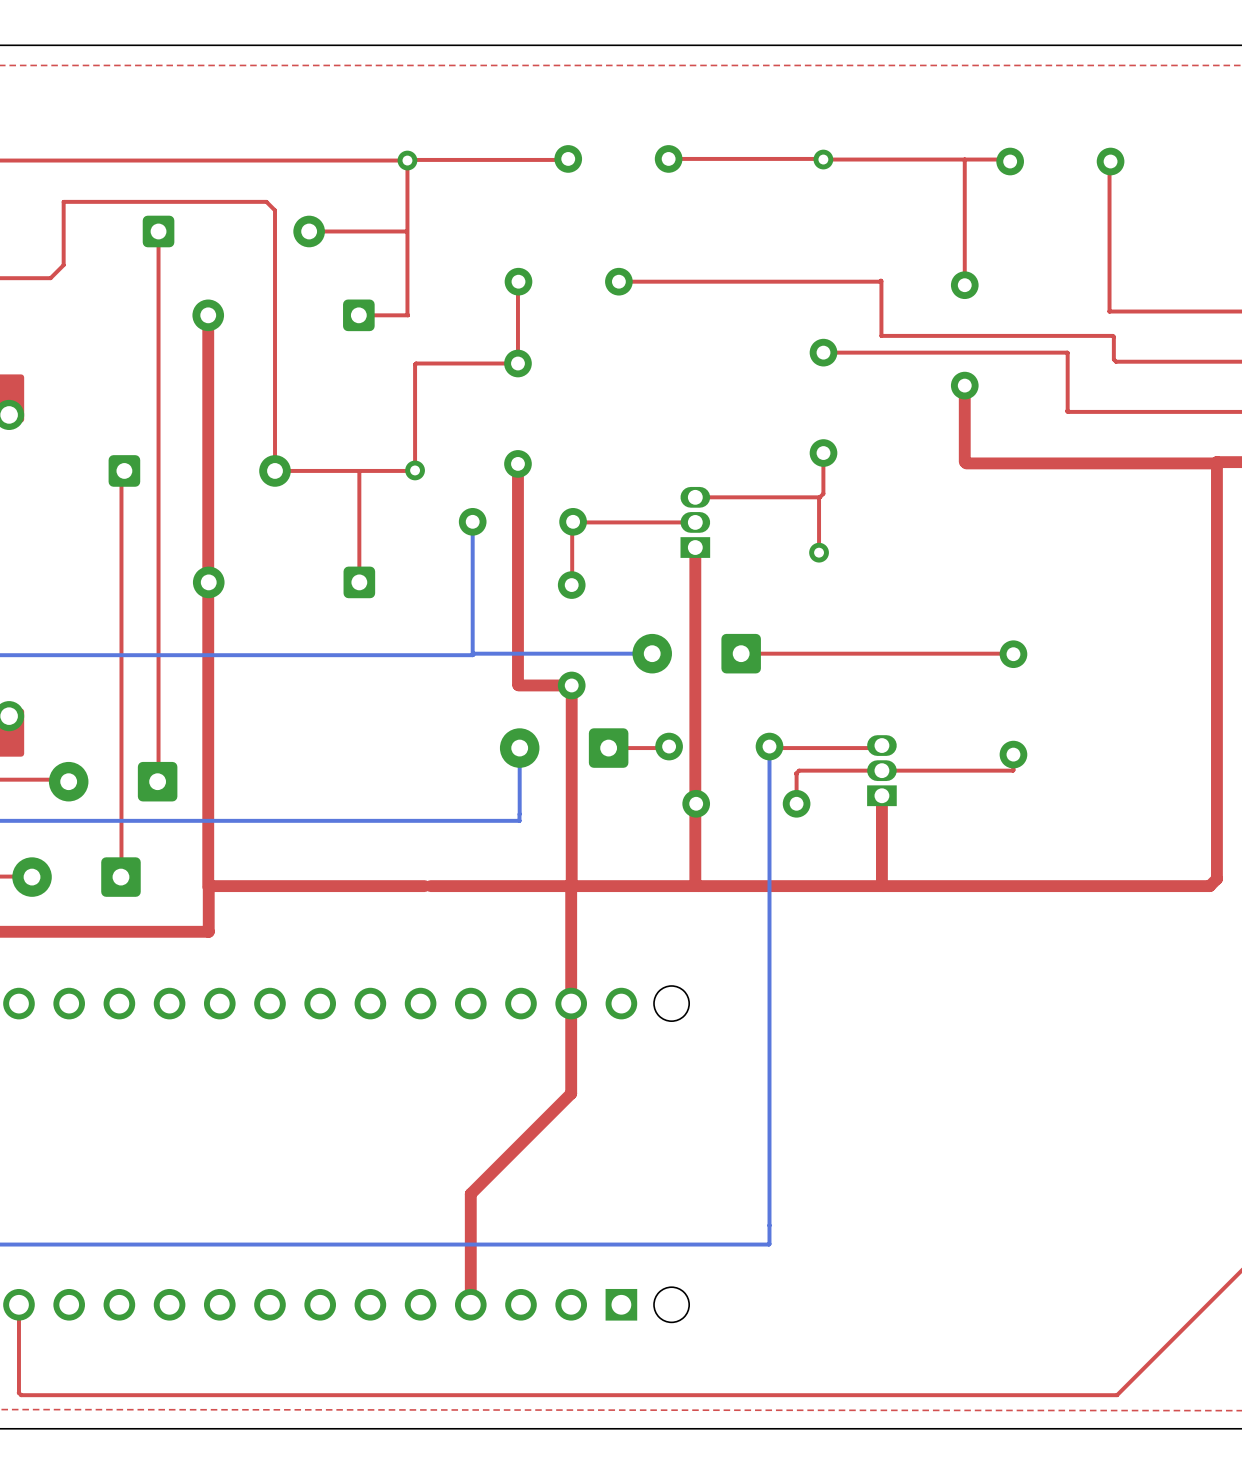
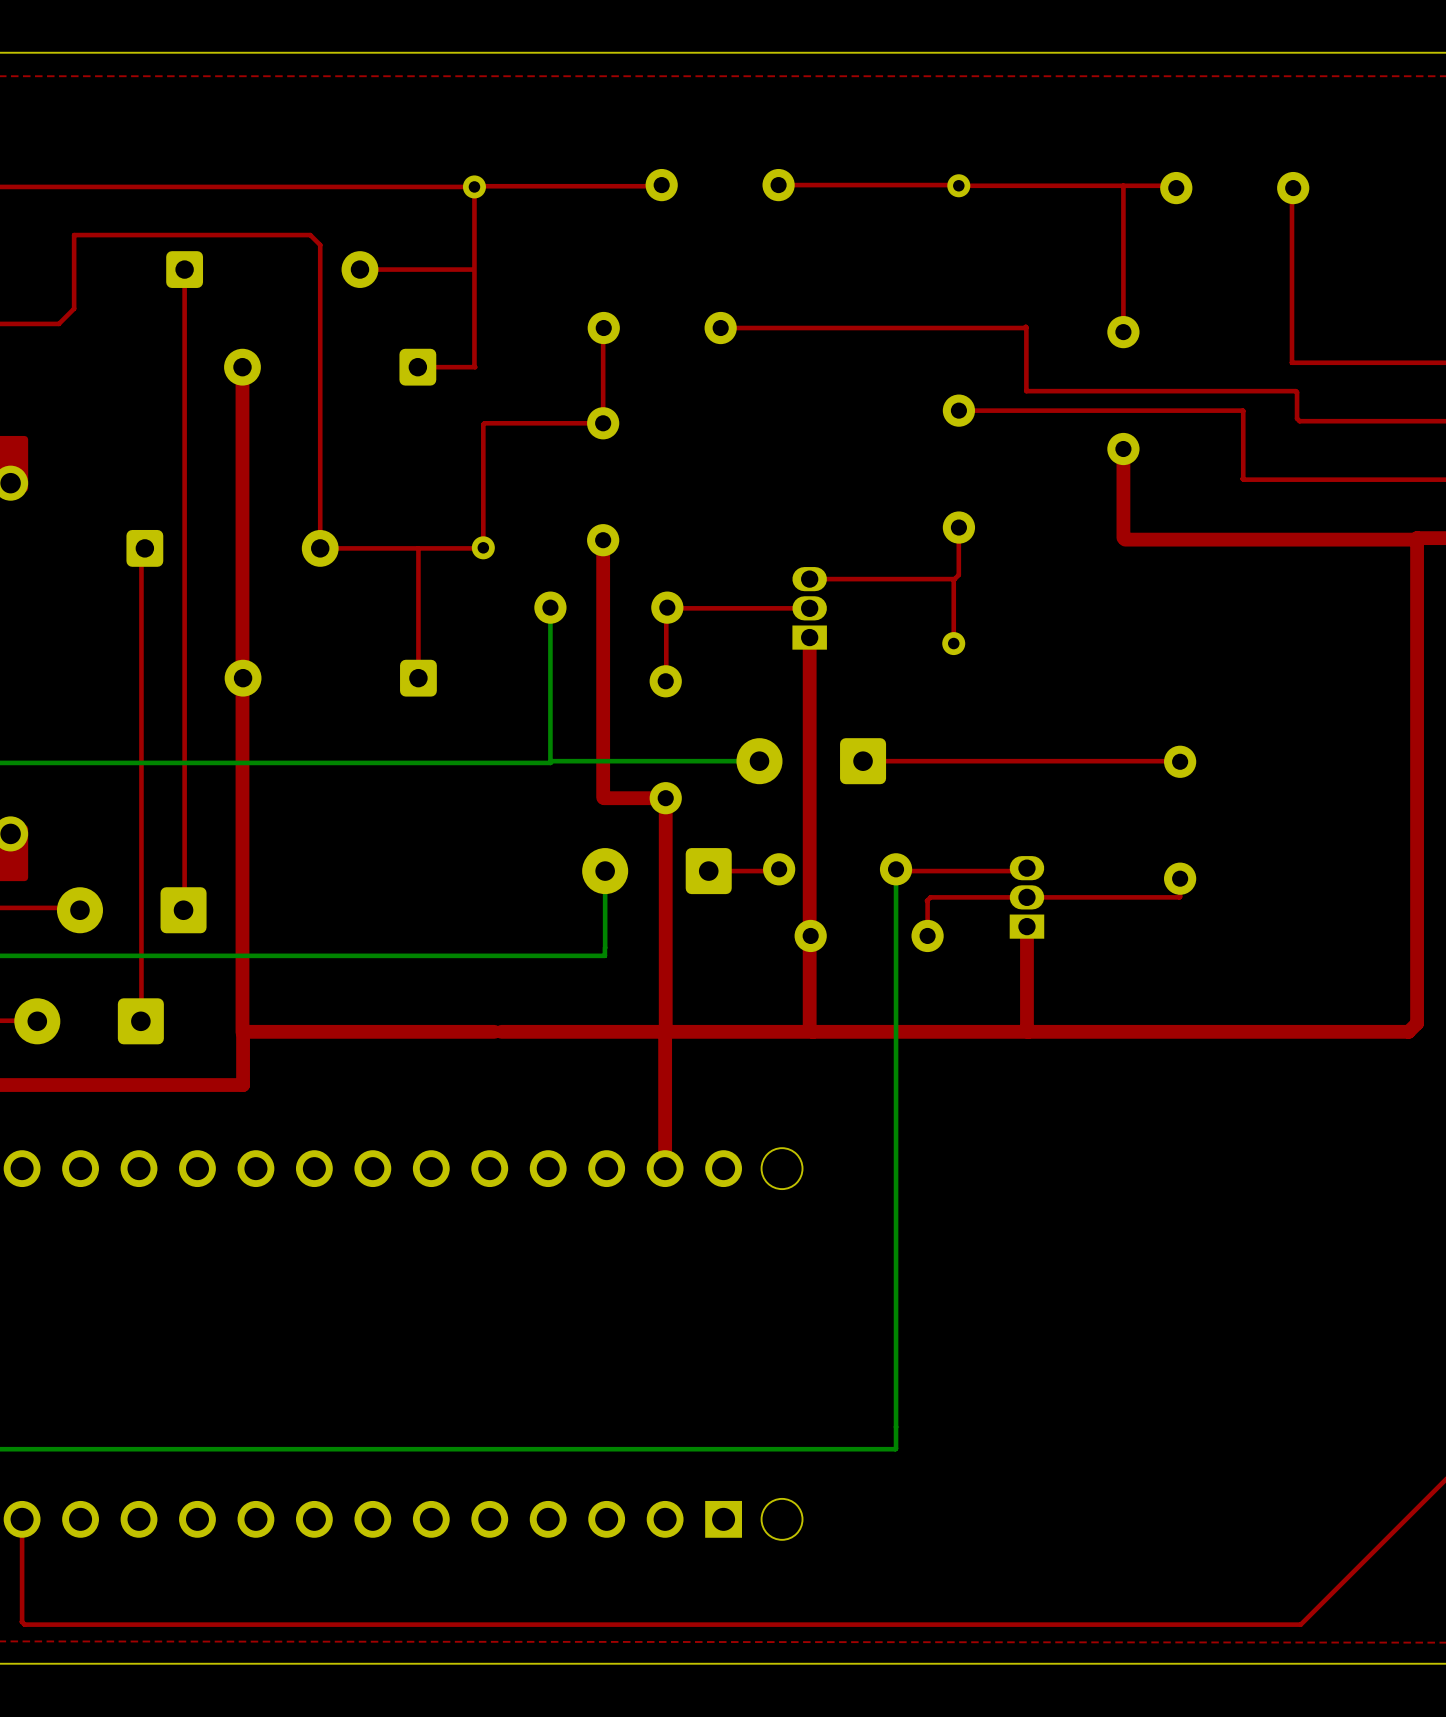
top track: (571, 1003) (571, 1093) (470, 1194) (470, 1304) -> none

